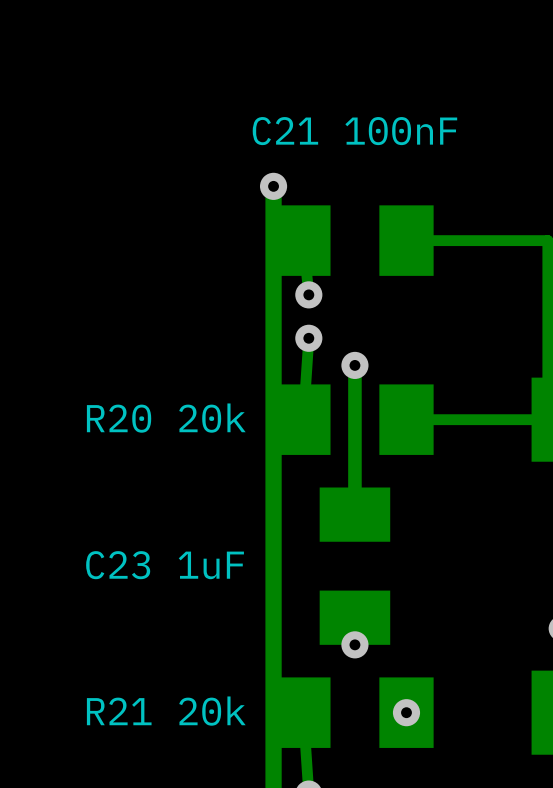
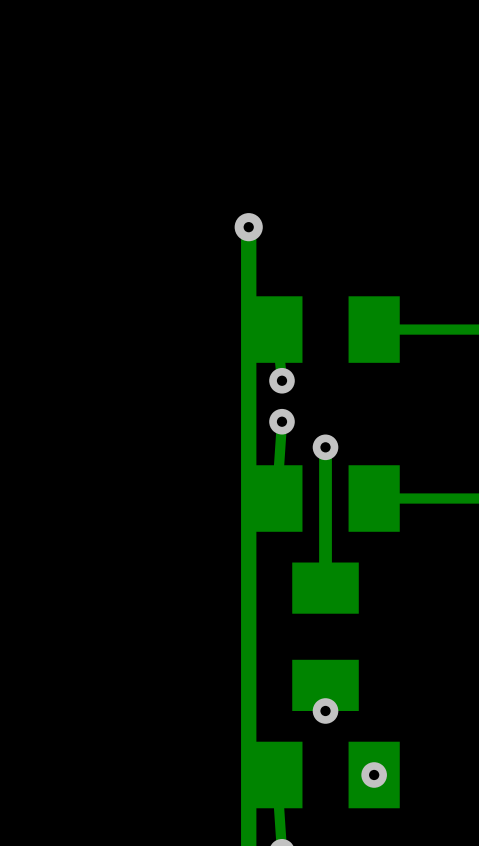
text: C21 100nF (354, 131) -> none
track: none -> (248, 227) (248, 278)
via: none -> (248, 227)
via: (273, 186) -> none
text: R20 20k (166, 418) -> none
text: C23 1uF (165, 565) -> none
text: R21 20k (166, 711) -> none

